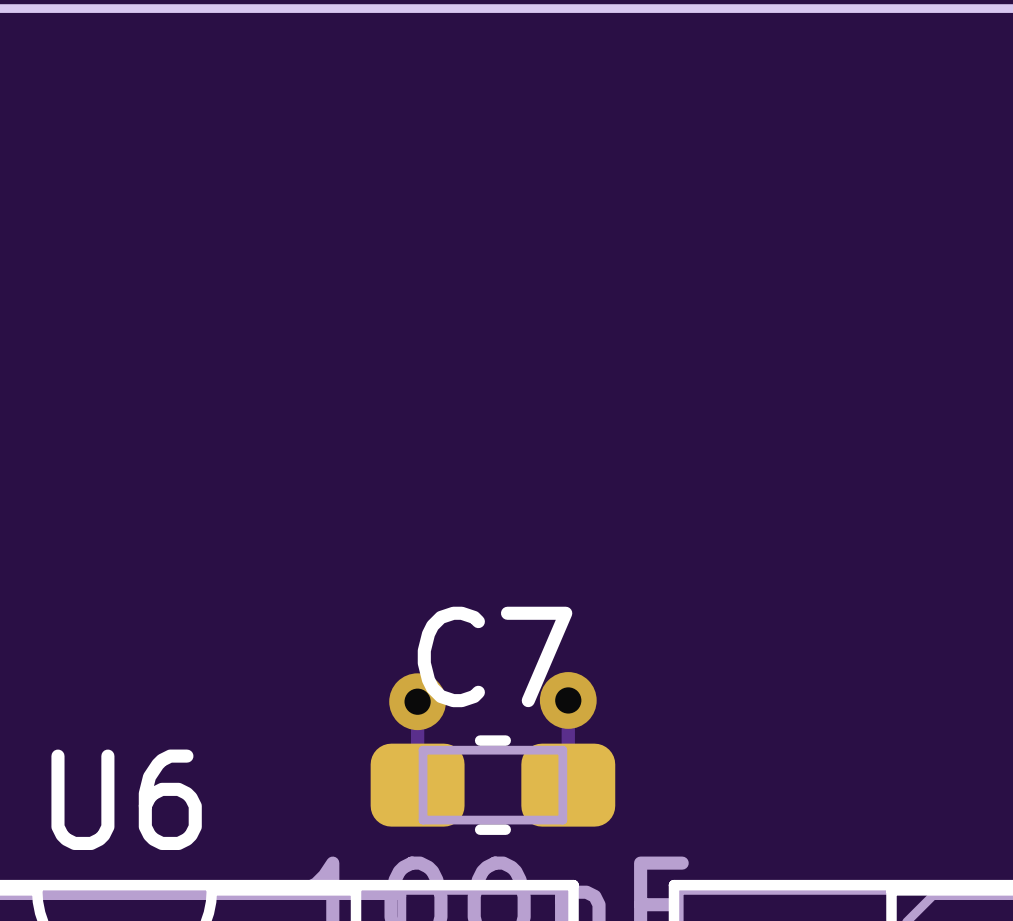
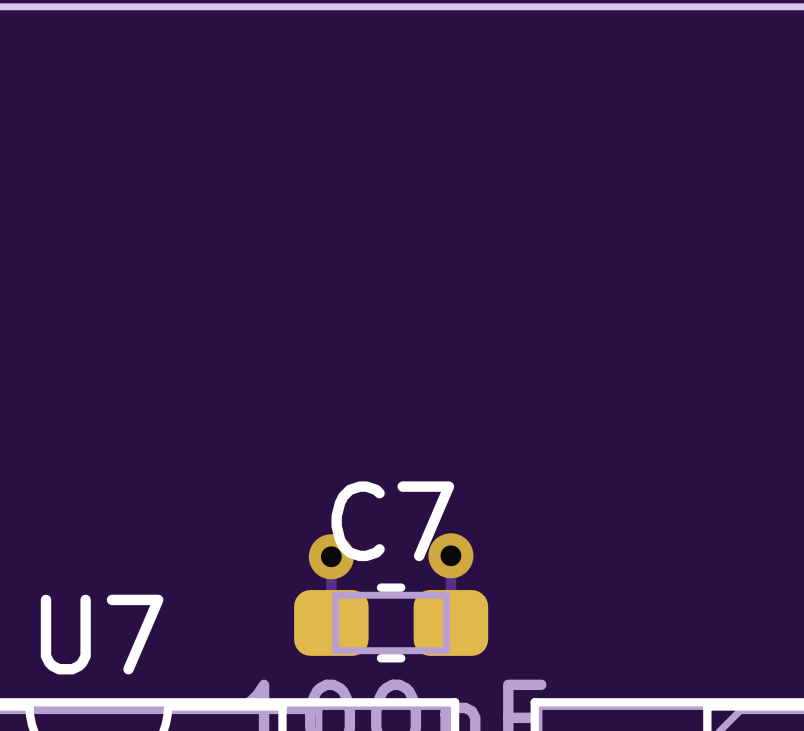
U6 name: U6 (126, 799) -> U7 (102, 634)

